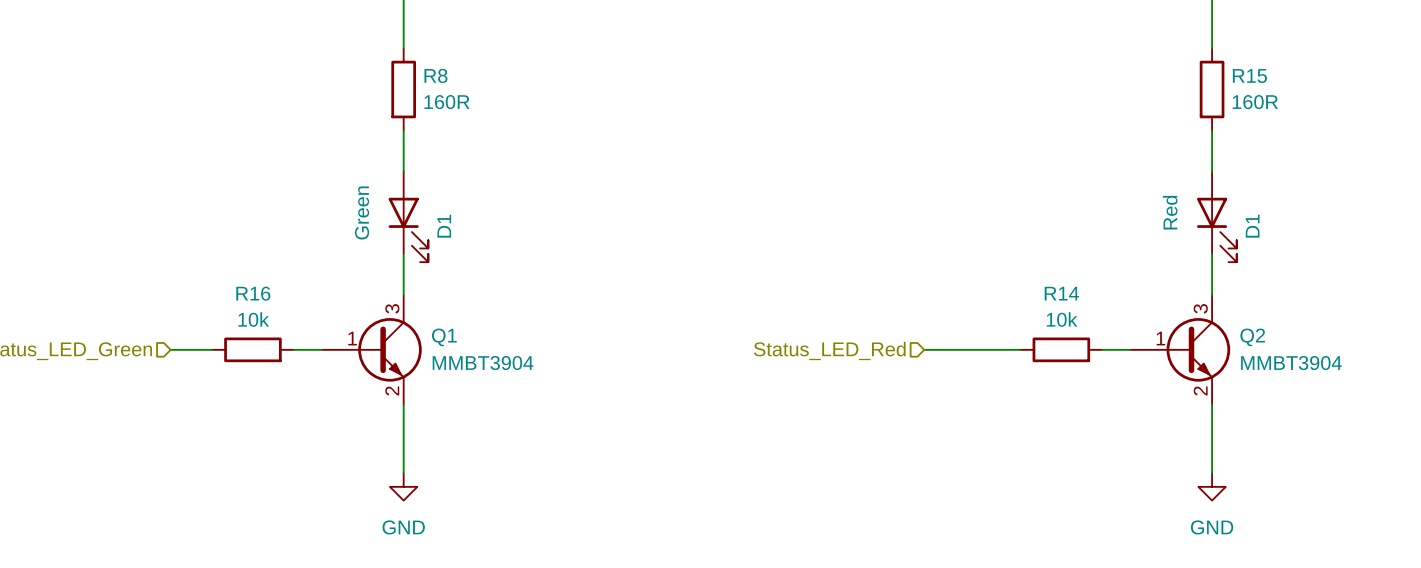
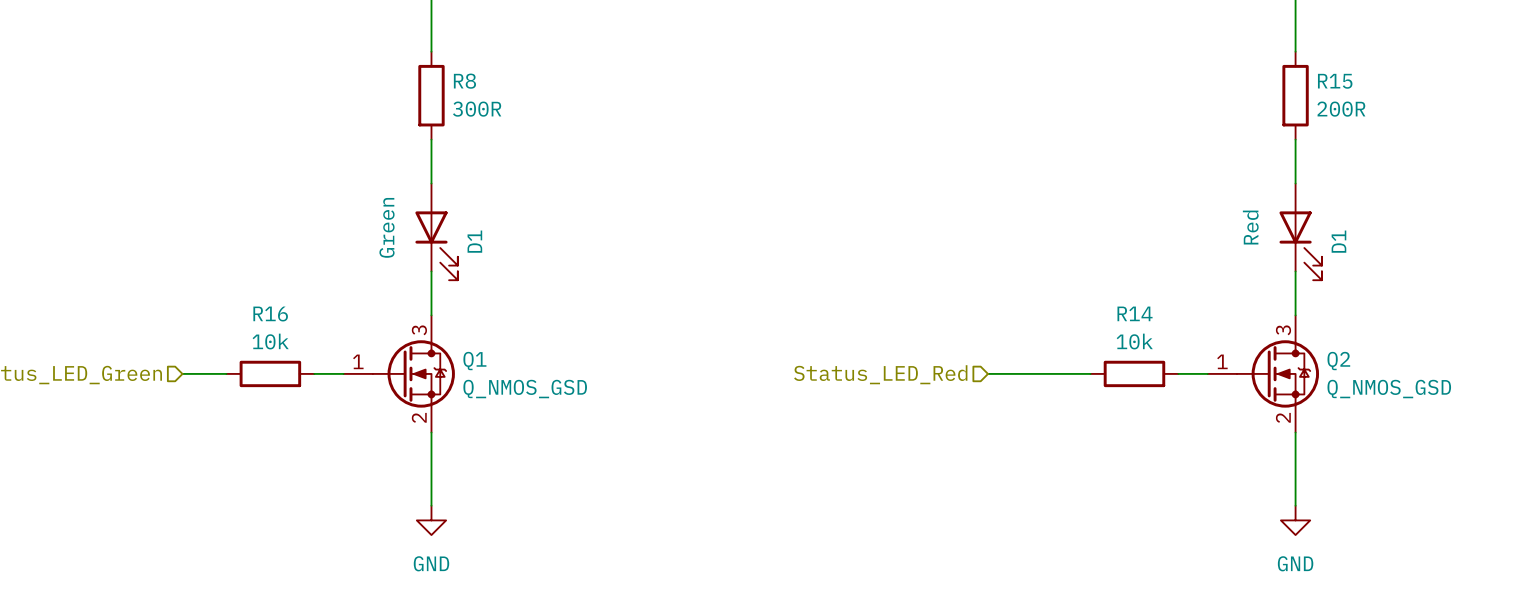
R8 value: 160R (446, 102) -> 300R (477, 109)
R15 value: 160R (1255, 102) -> 200R (1341, 109)
Q1 symbol: [321, 295, 422, 405] -> [343, 315, 455, 433]
Q2 symbol: [1129, 295, 1231, 405] -> [1207, 315, 1320, 433]
Q1 value: MMBT3904 (483, 363) -> Q_NMOS_GSD (525, 389)
Q2 value: MMBT3904 (1291, 363) -> Q_NMOS_GSD (1389, 389)

